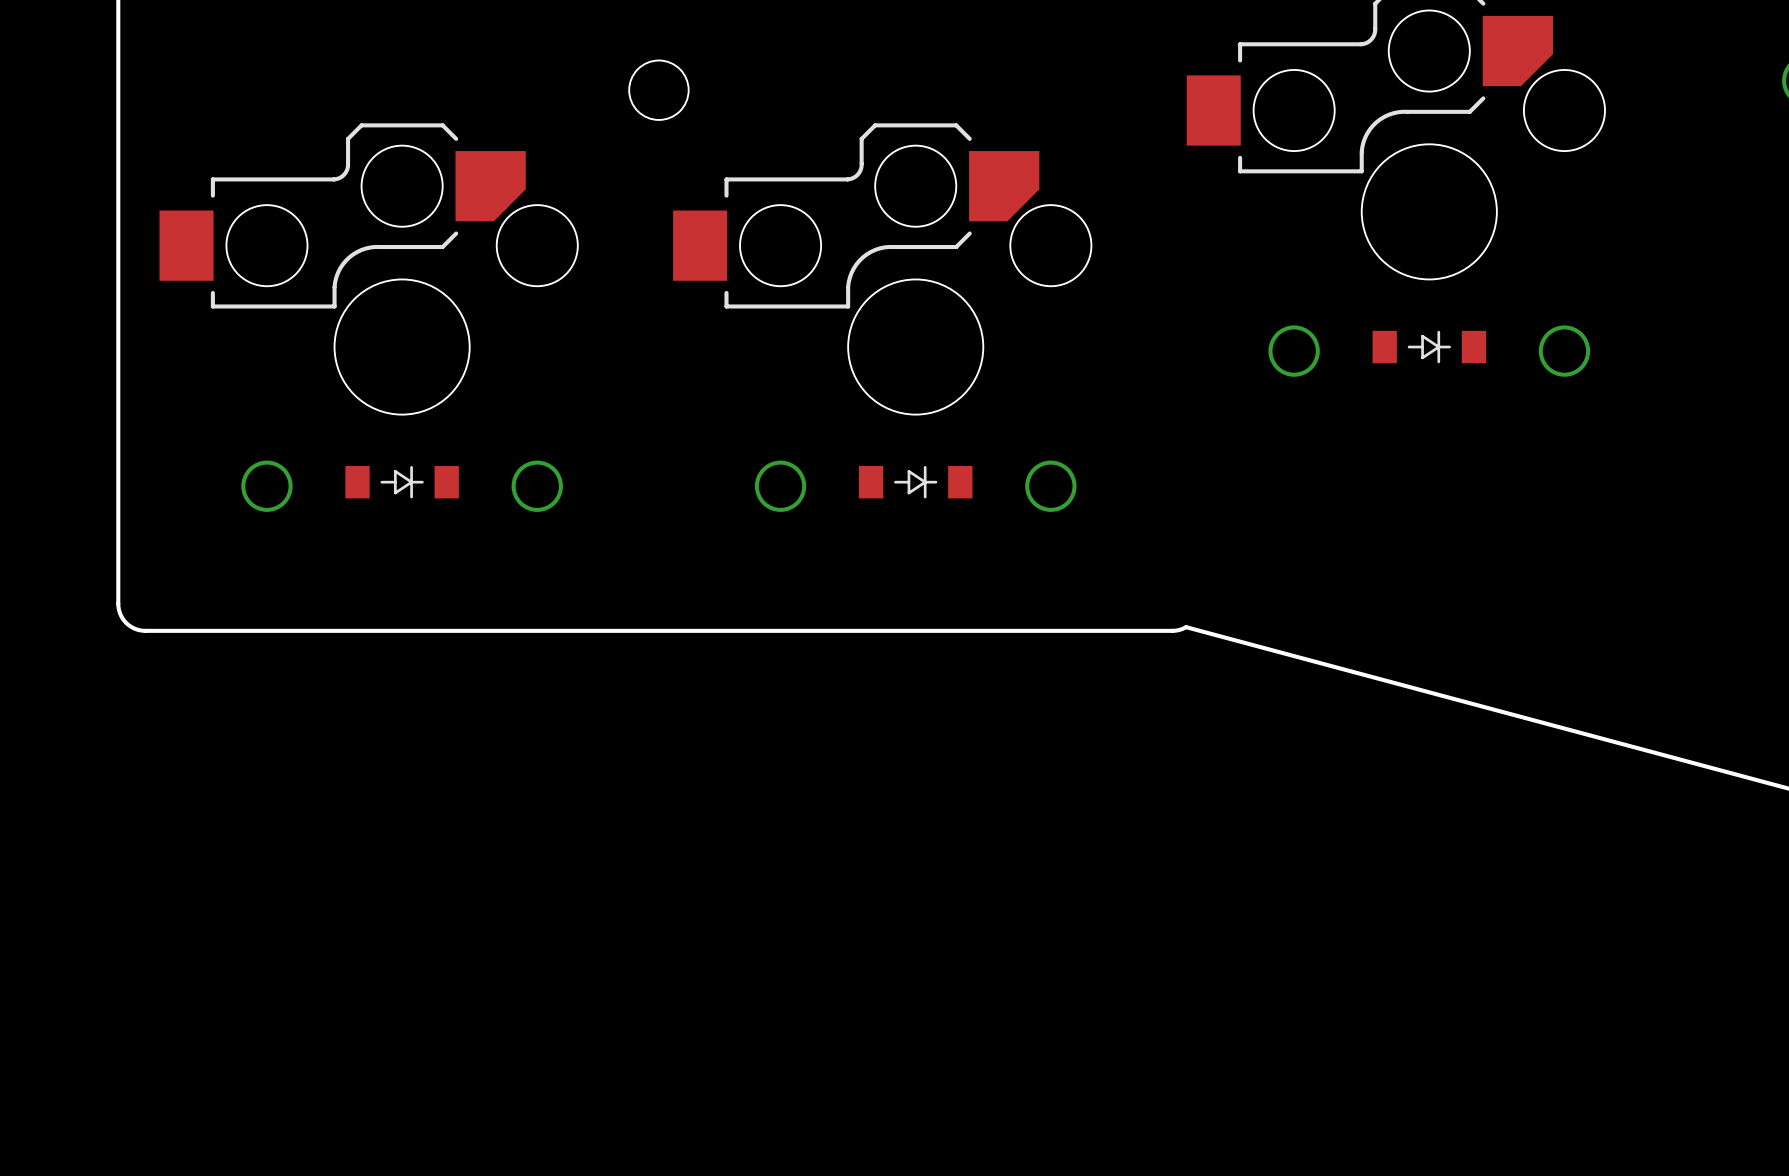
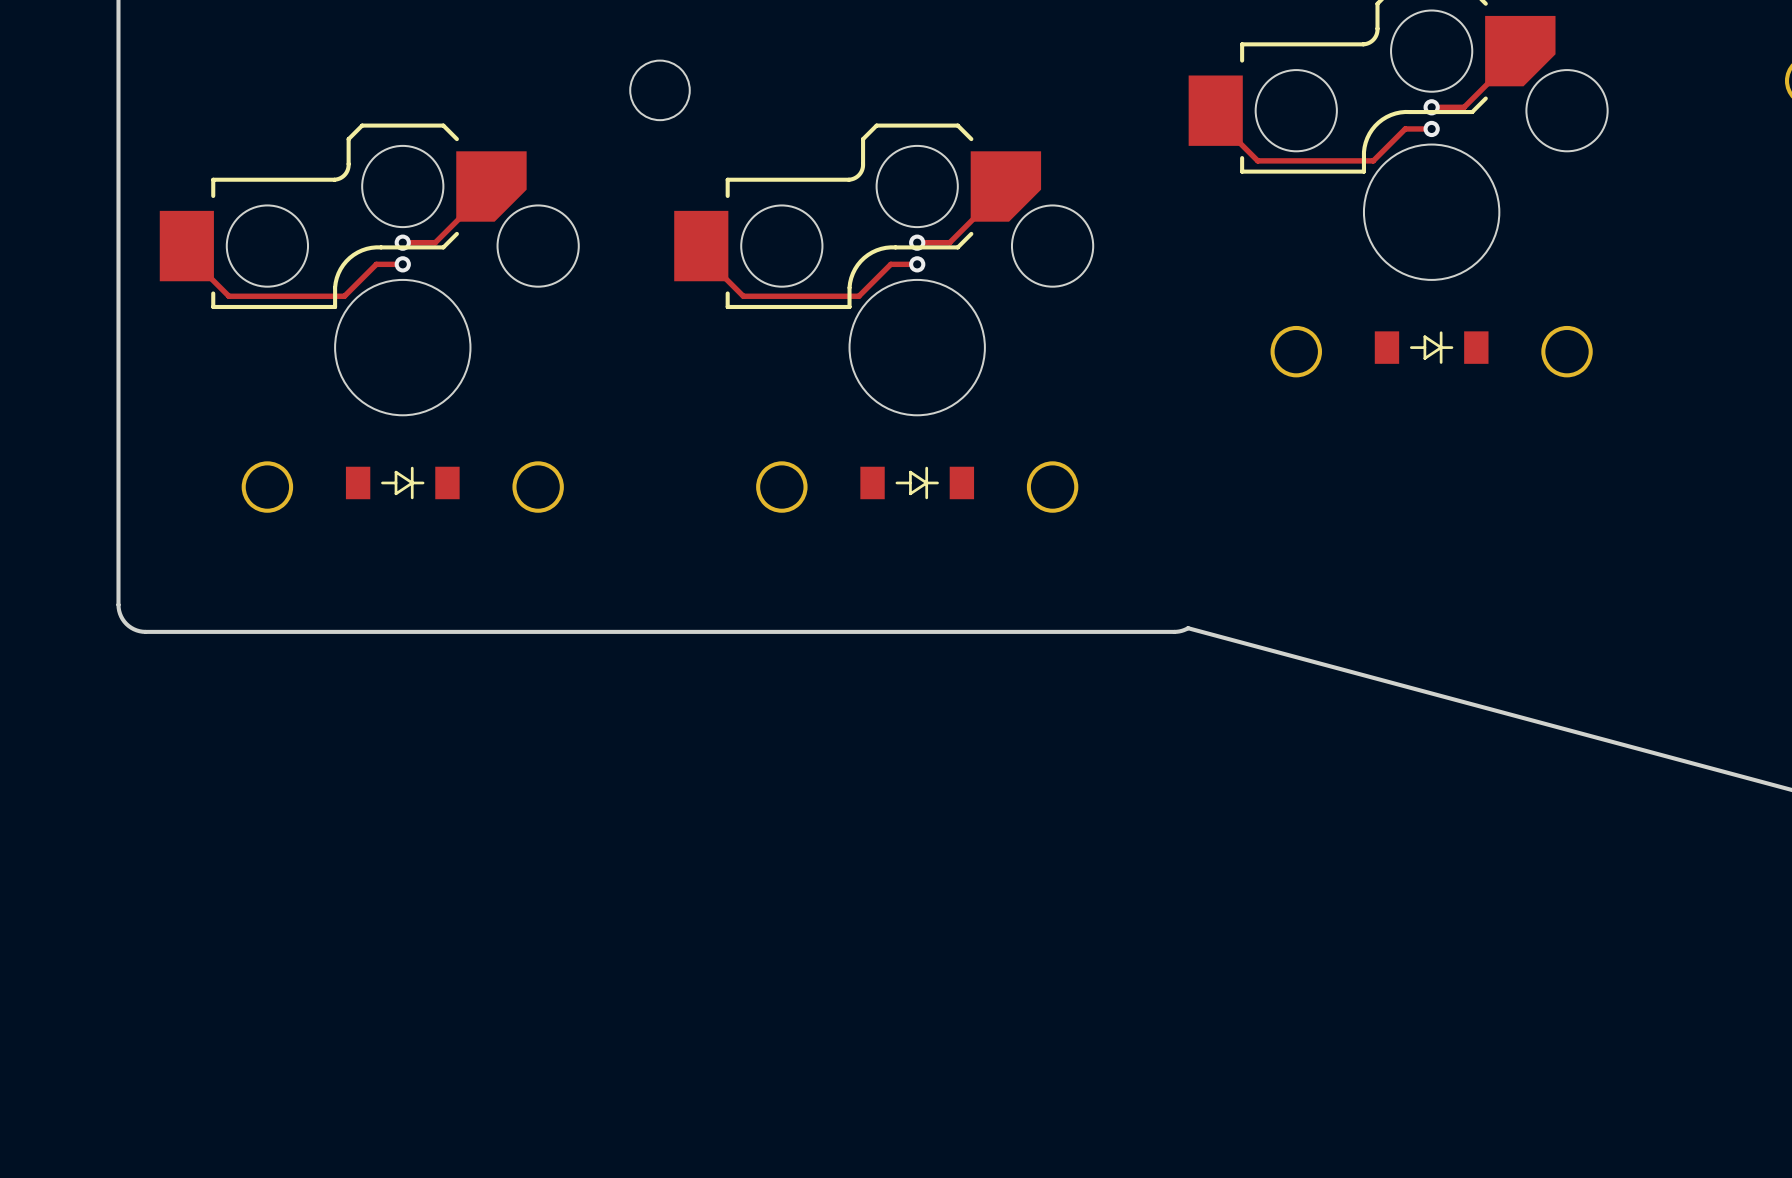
track: none -> (1520, 51) (1464, 107) (1431, 107)
via: none -> (1431, 107)
track: none -> (1207, 110) (1257, 160) (1373, 160) (1405, 128) (1431, 128)
via: none -> (1431, 128)
track: none -> (491, 186) (435, 242) (402, 242)
track: none -> (1005, 186) (949, 242) (917, 242)
via: none -> (402, 242)
via: none -> (917, 242)
track: none -> (178, 246) (228, 296) (344, 296) (376, 264) (402, 264)
track: none -> (693, 246) (743, 296) (858, 296) (890, 264) (917, 264)
via: none -> (402, 264)
via: none -> (917, 264)

